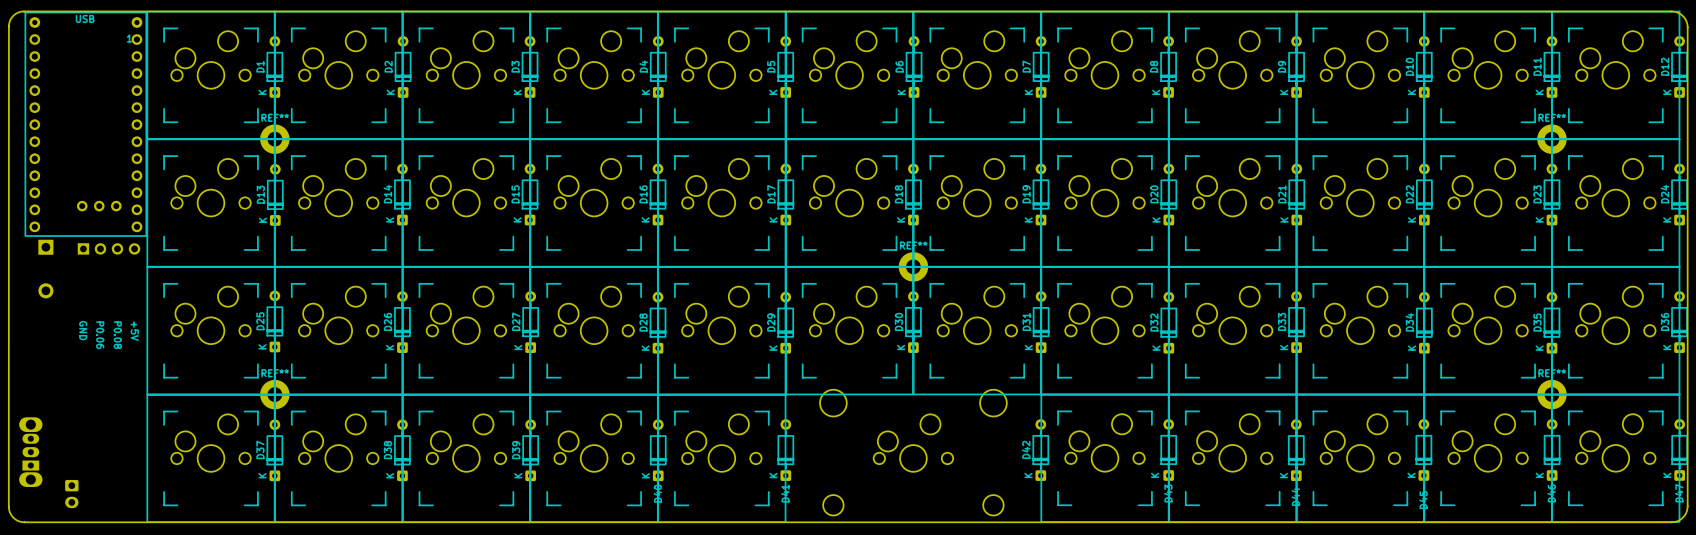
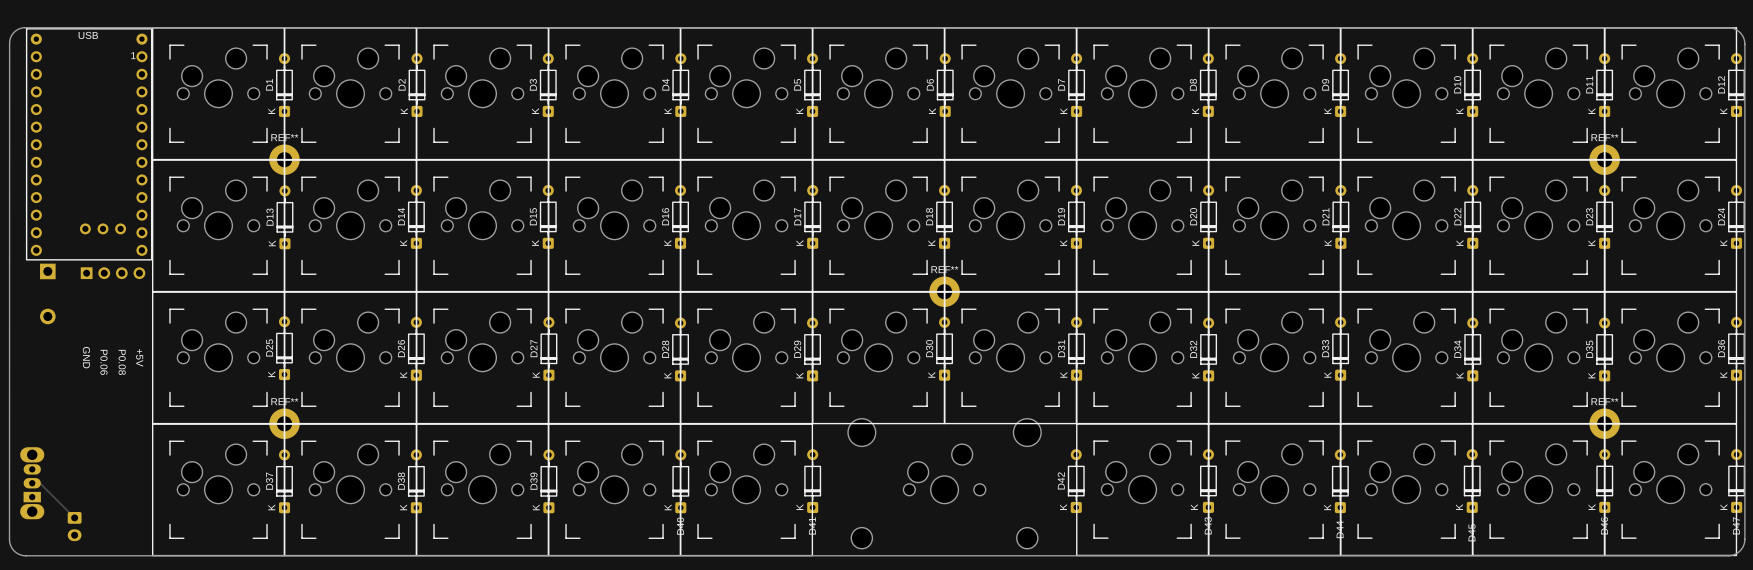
track: none -> (39, 483) (74, 517)

